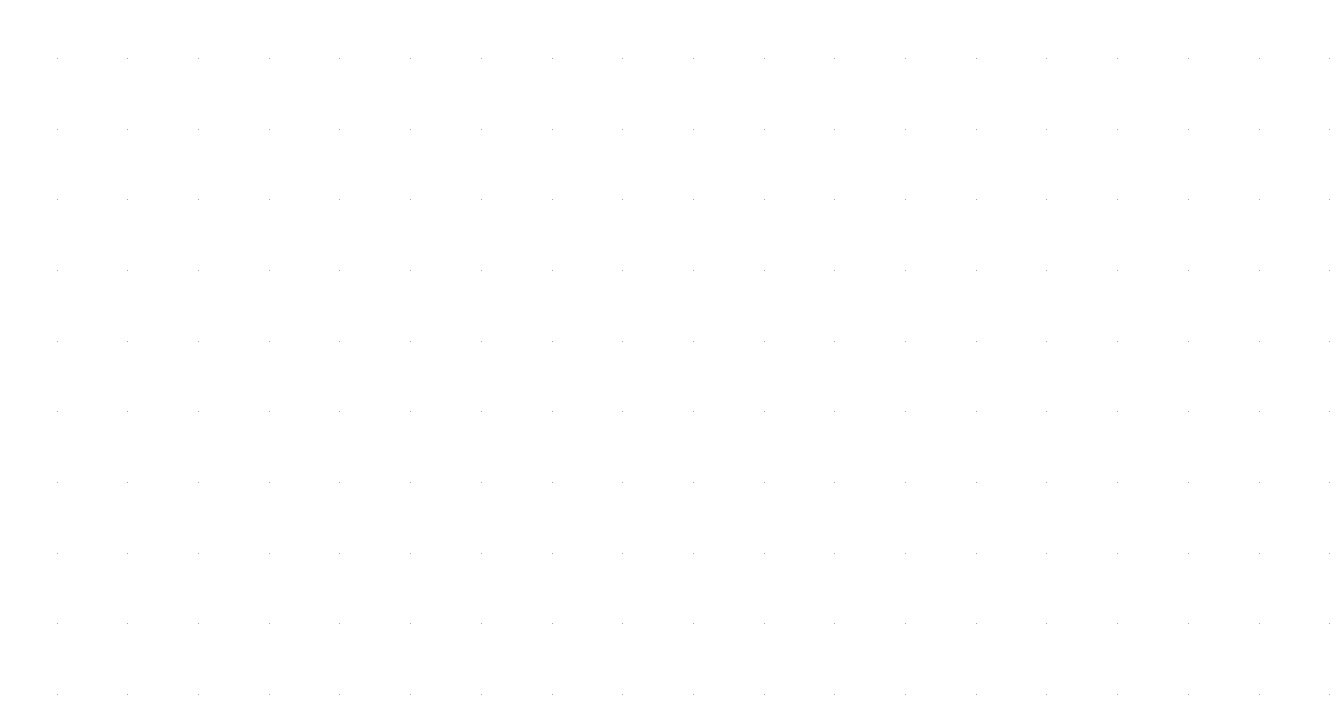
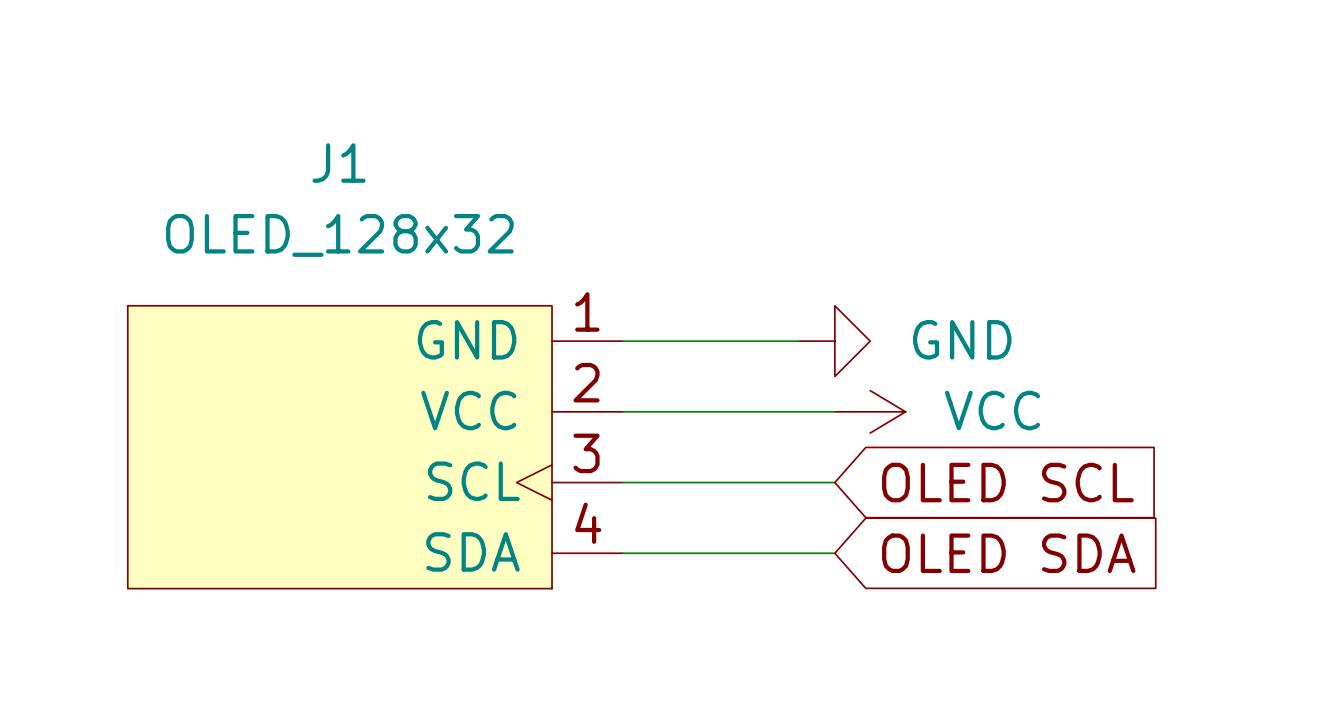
wire: none -> (622, 341) (799, 341)
power symbol: none -> GND (834, 341)
wire: none -> (622, 411) (834, 411)
power symbol: none -> VCC (870, 411)
J1: none -> OLED_128x32 (375, 447)
wire: none -> (622, 482) (834, 482)
global label: none -> OLED SCL (1007, 482)
wire: none -> (622, 553) (834, 553)
global label: none -> OLED SDA (1008, 553)

